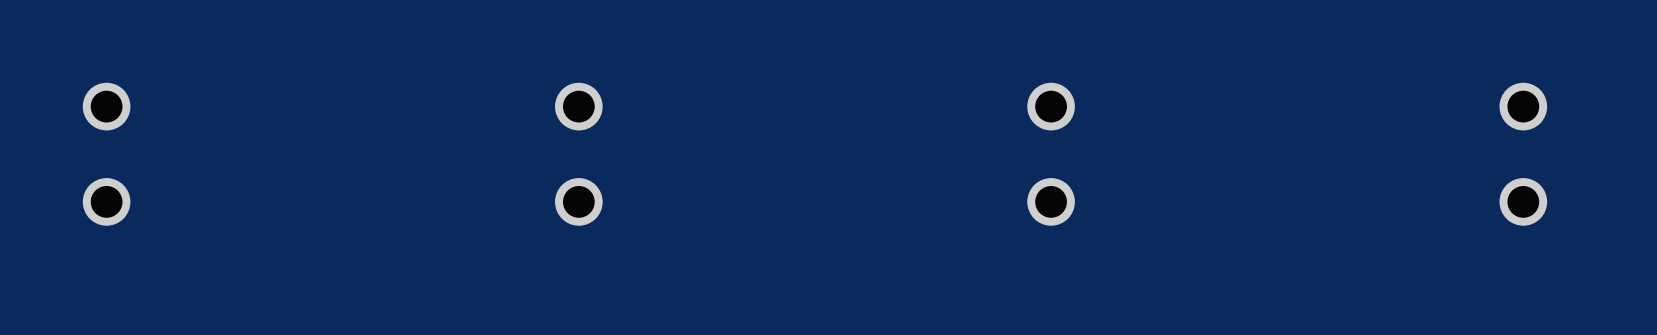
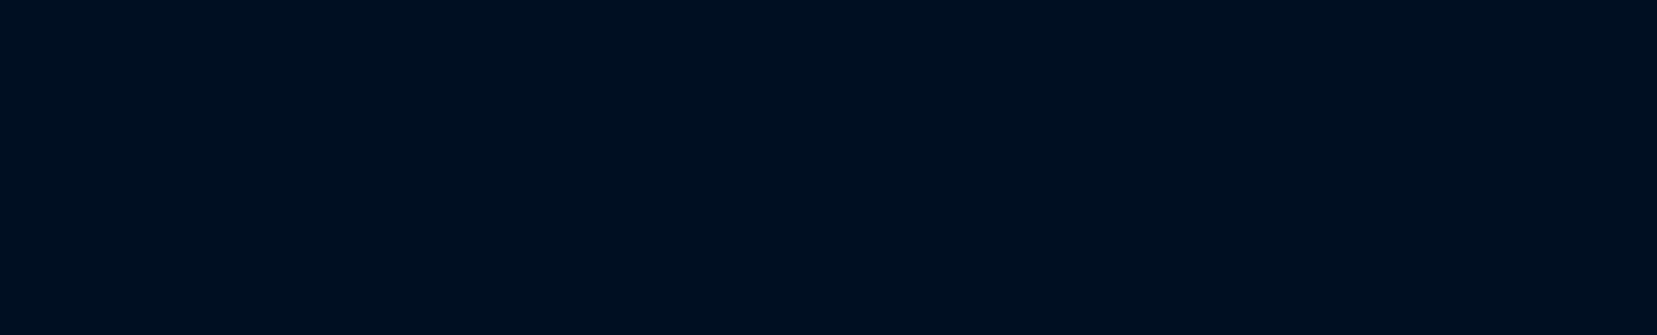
part: (106, 154) -> none
part: (578, 154) -> none
part: (1051, 154) -> none
part: (1523, 154) -> none

